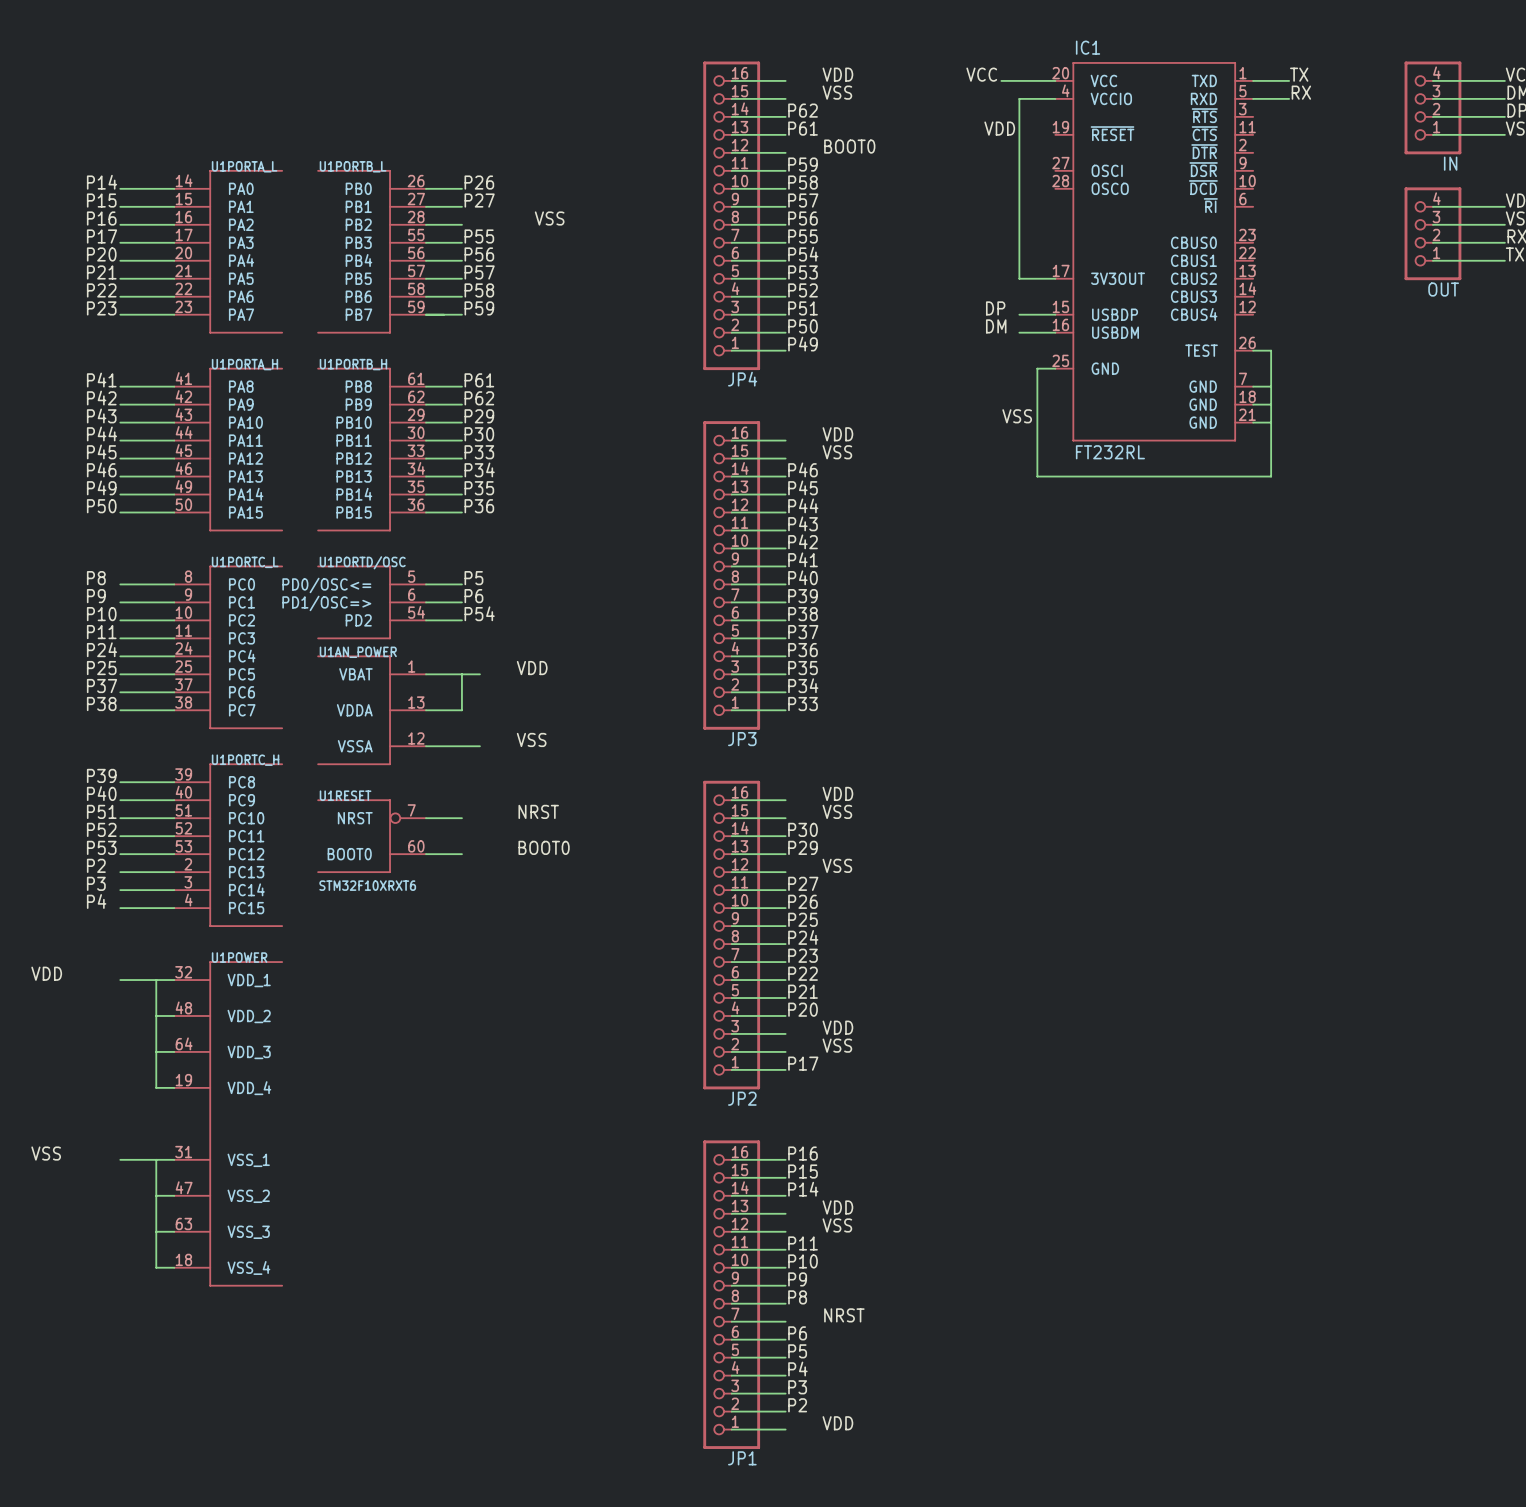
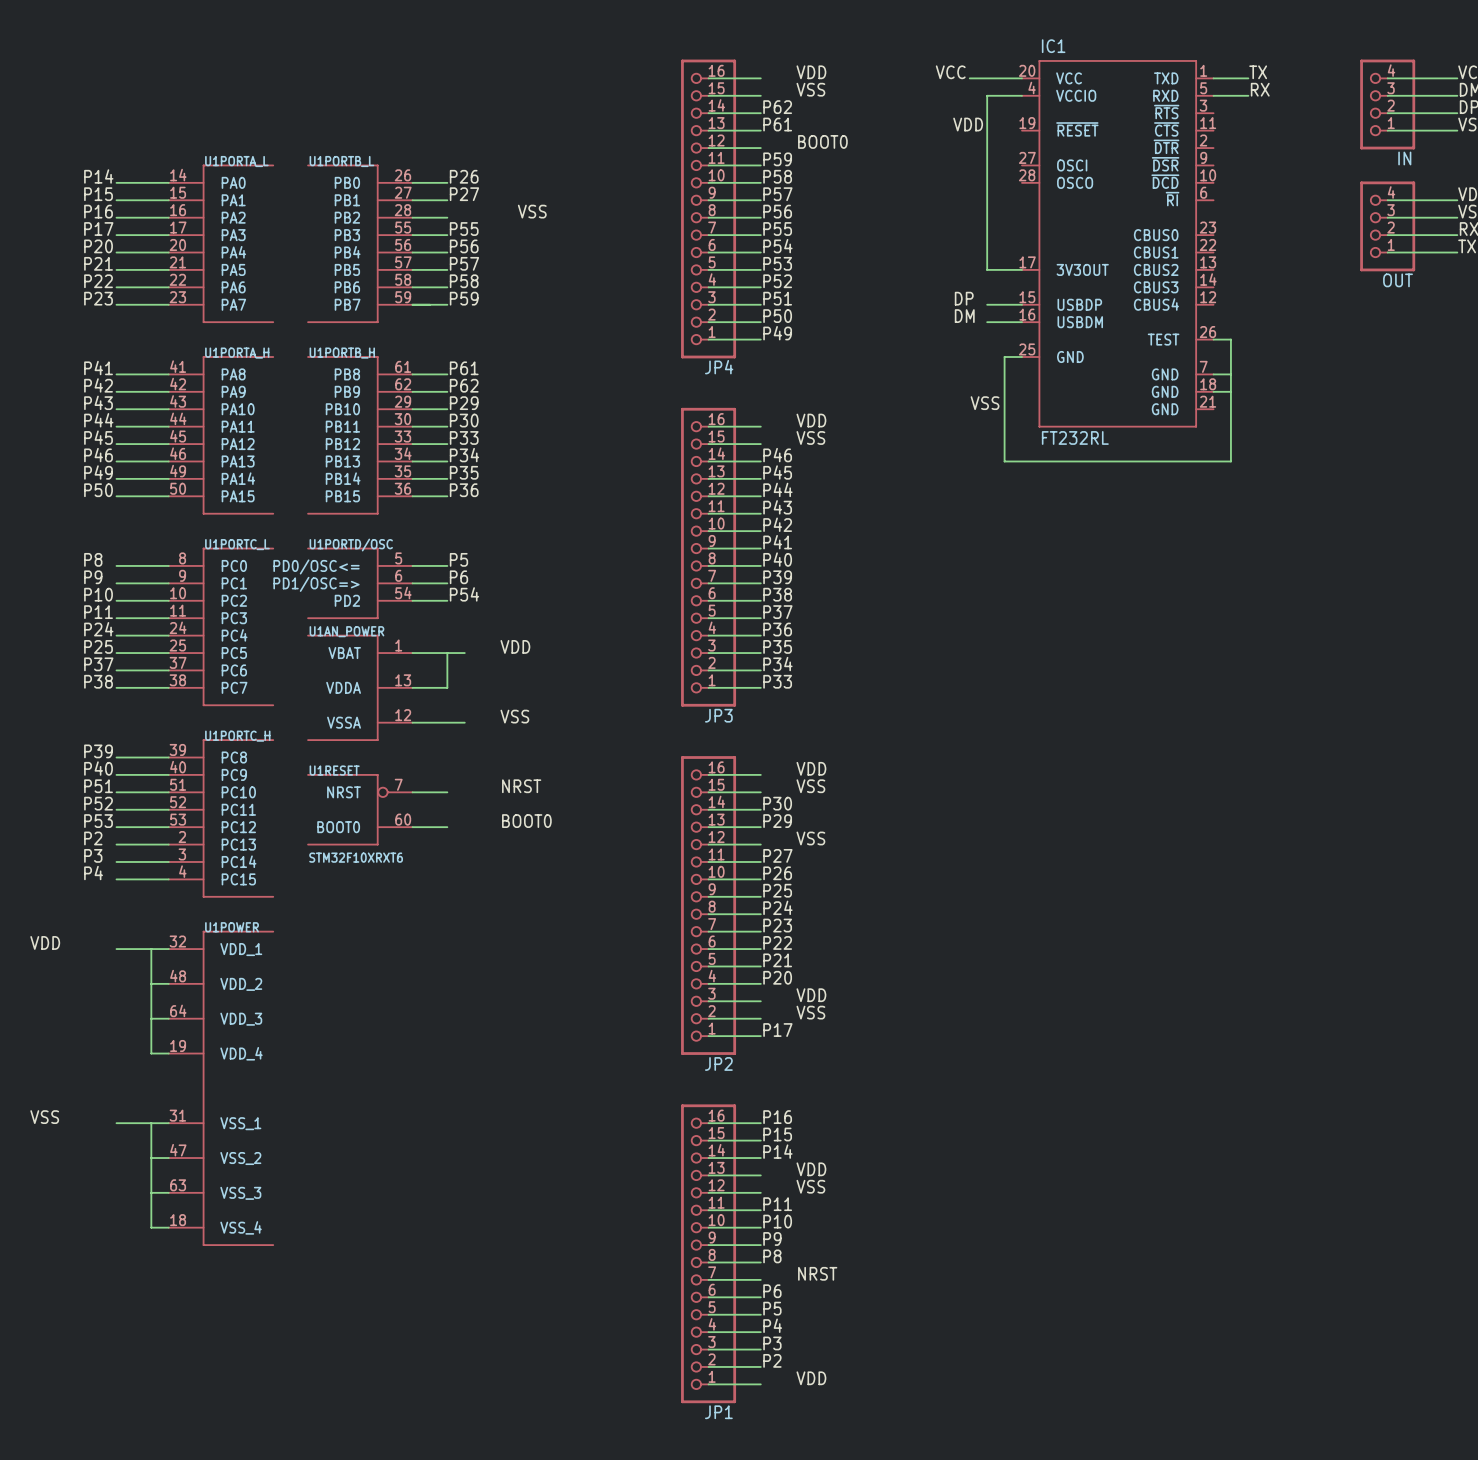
wire: (1253, 422) (1271, 422) -> none

